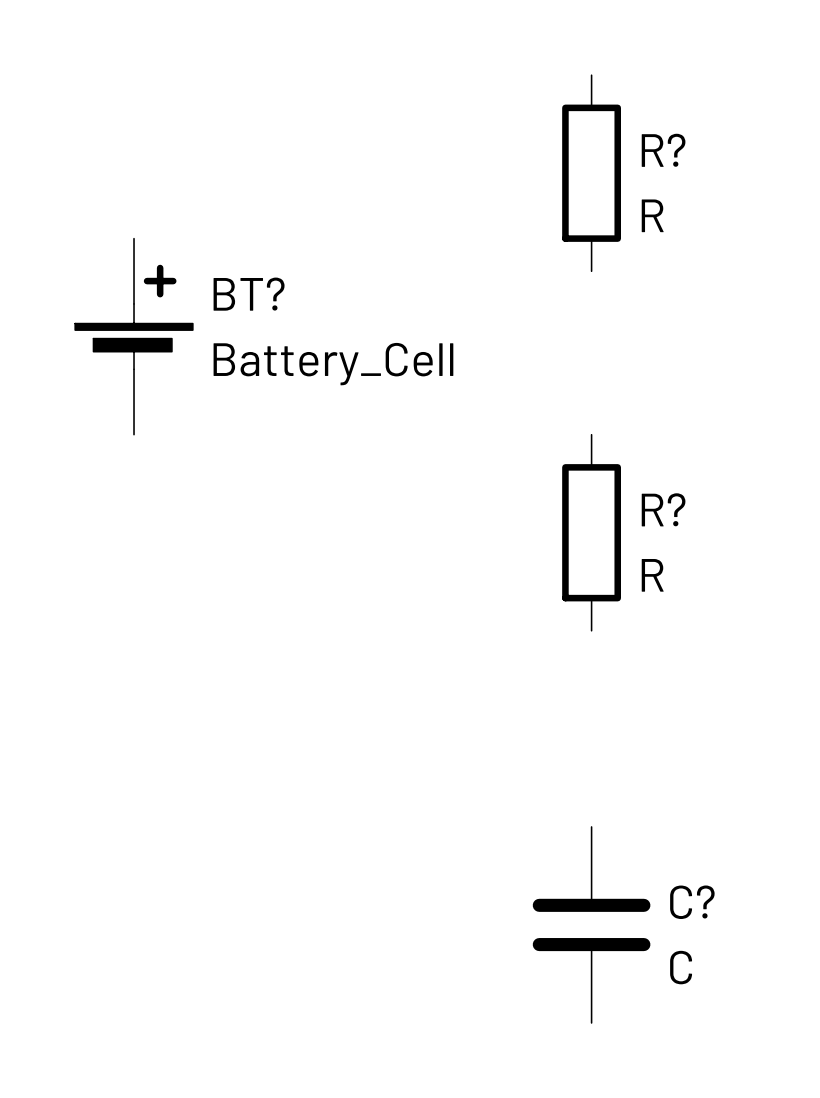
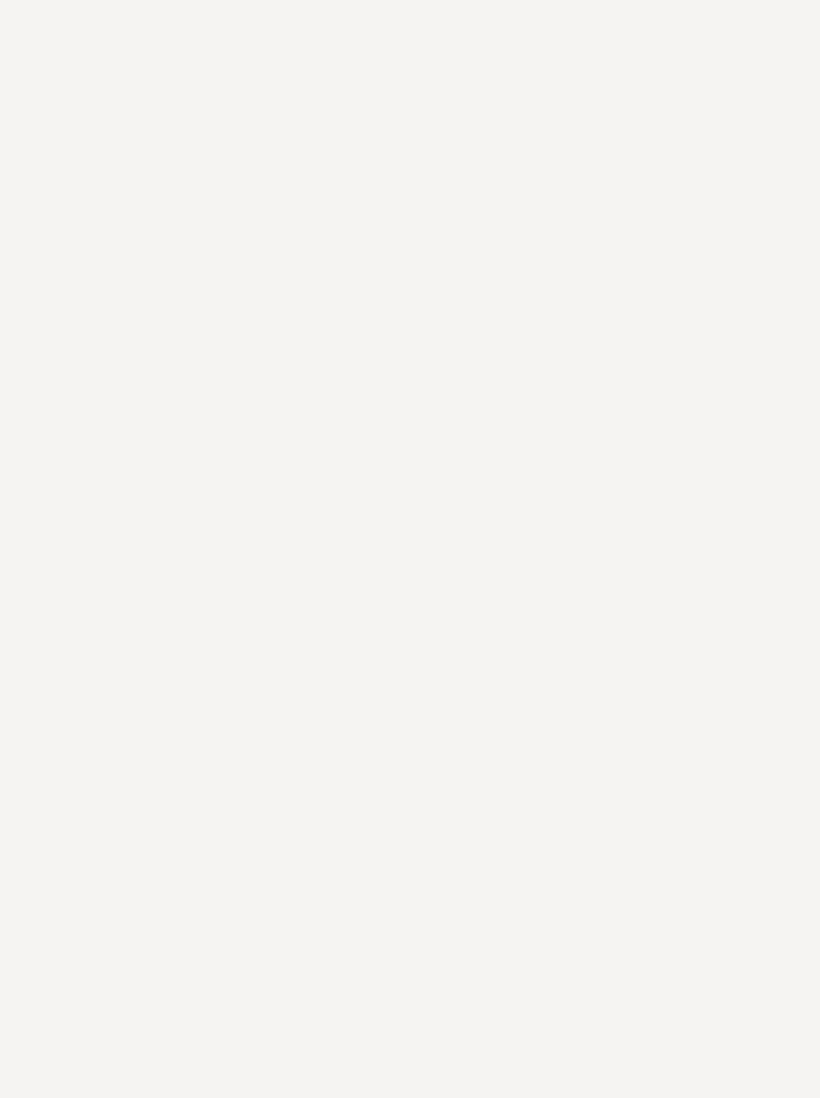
R?: R (591, 173) -> none
BT?: Battery_Cell (134, 336) -> none
R?: R (591, 532) -> none
C?: C (591, 924) -> none

